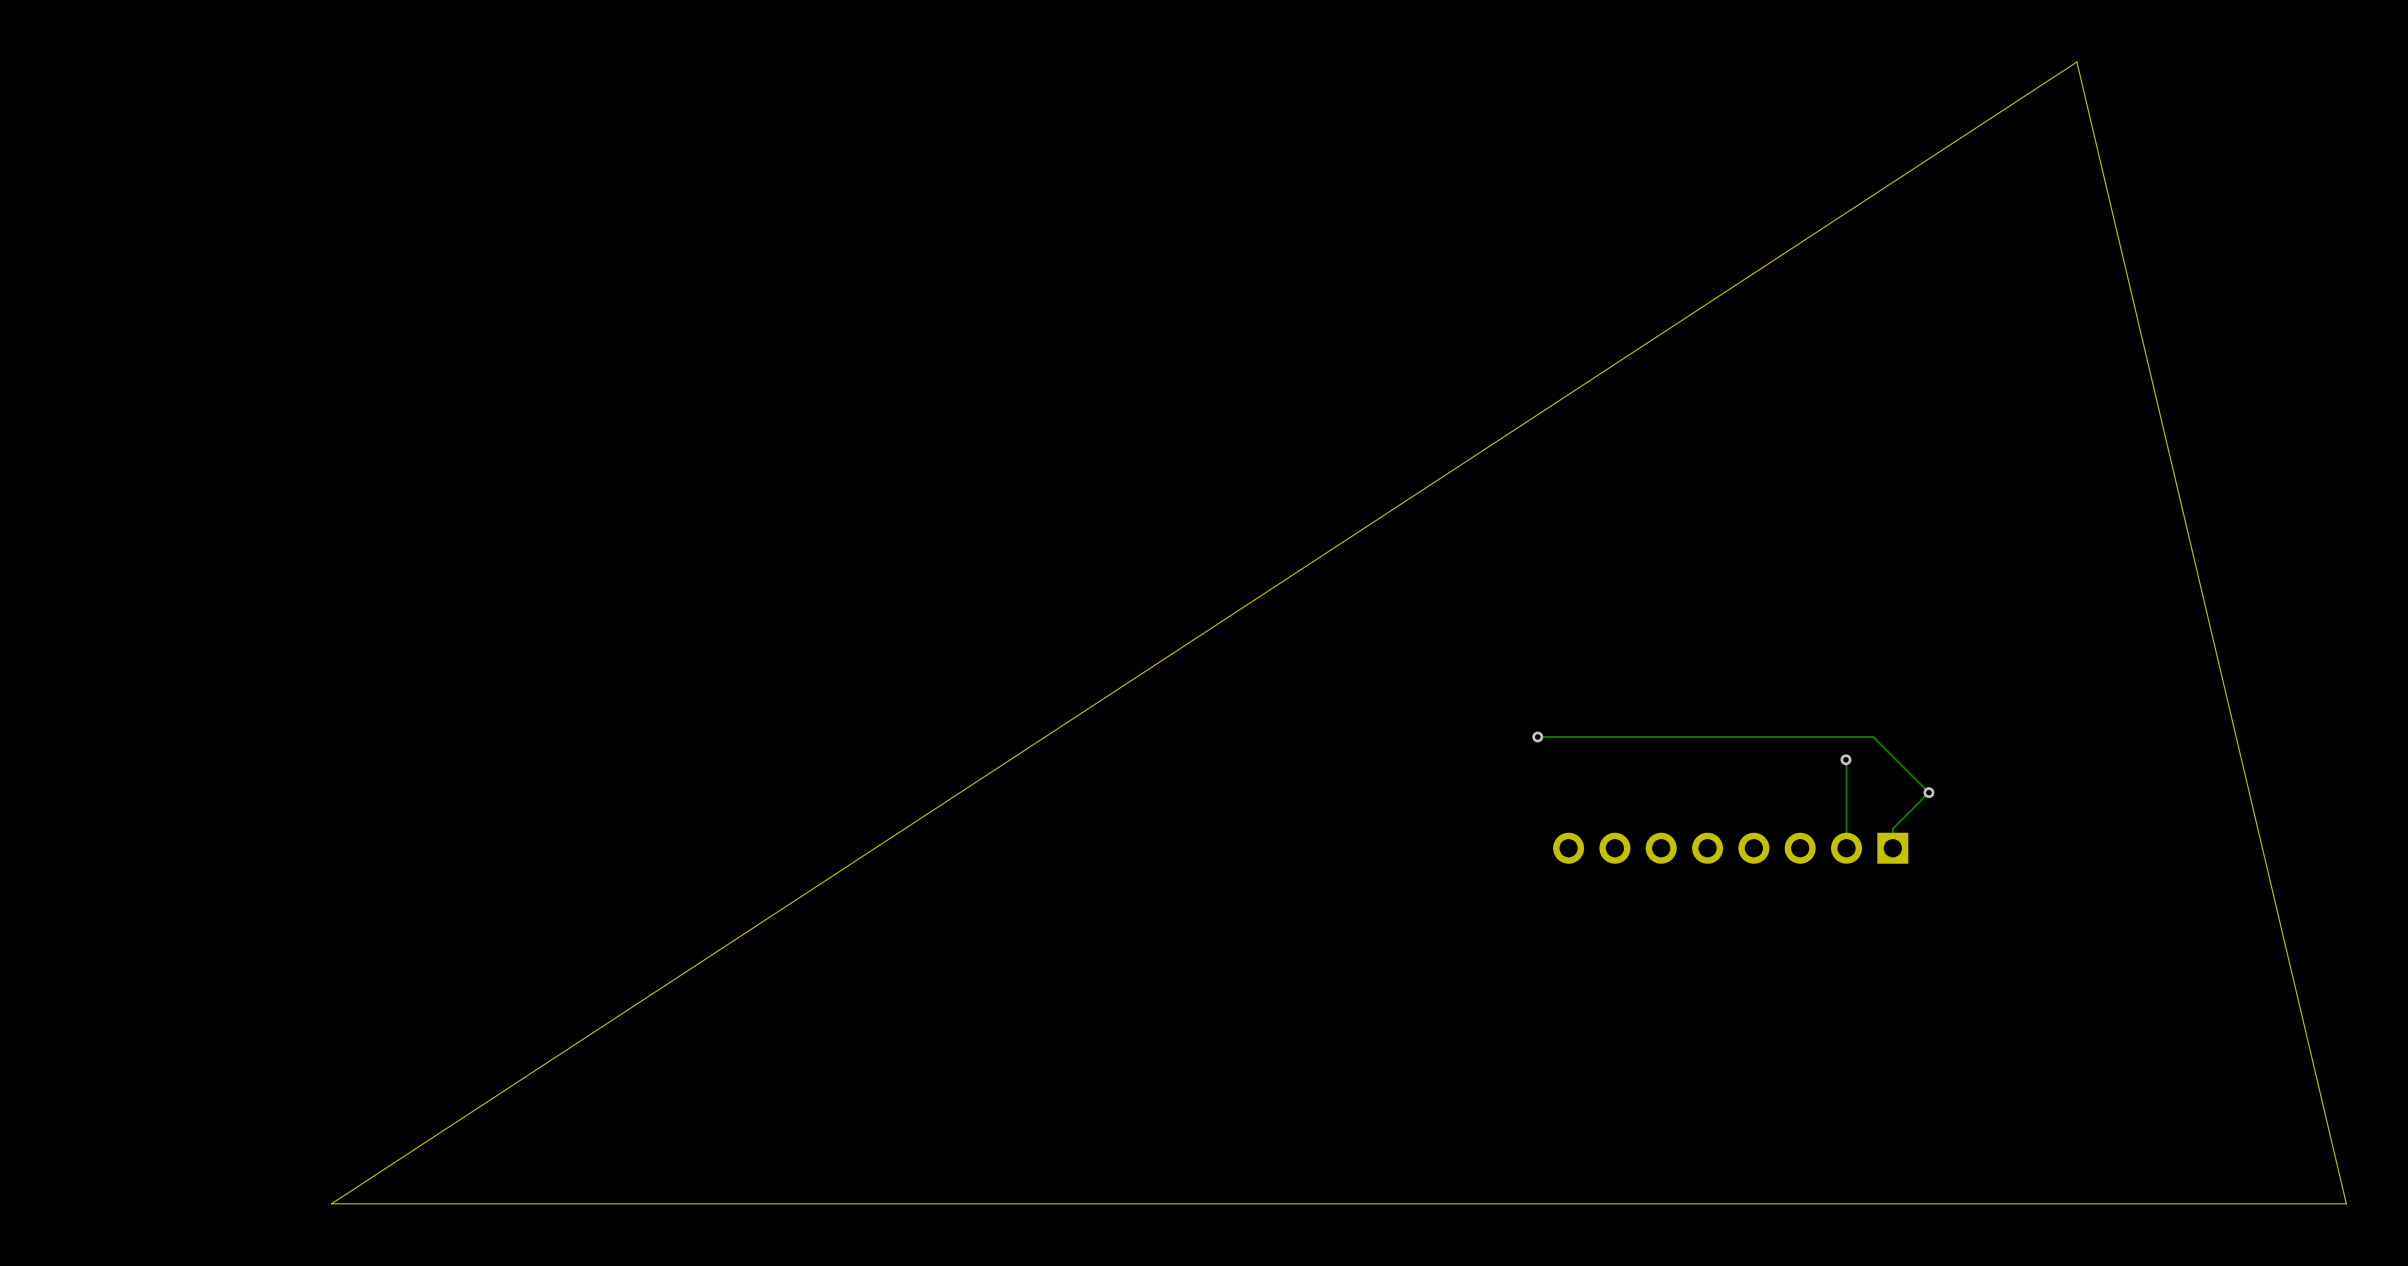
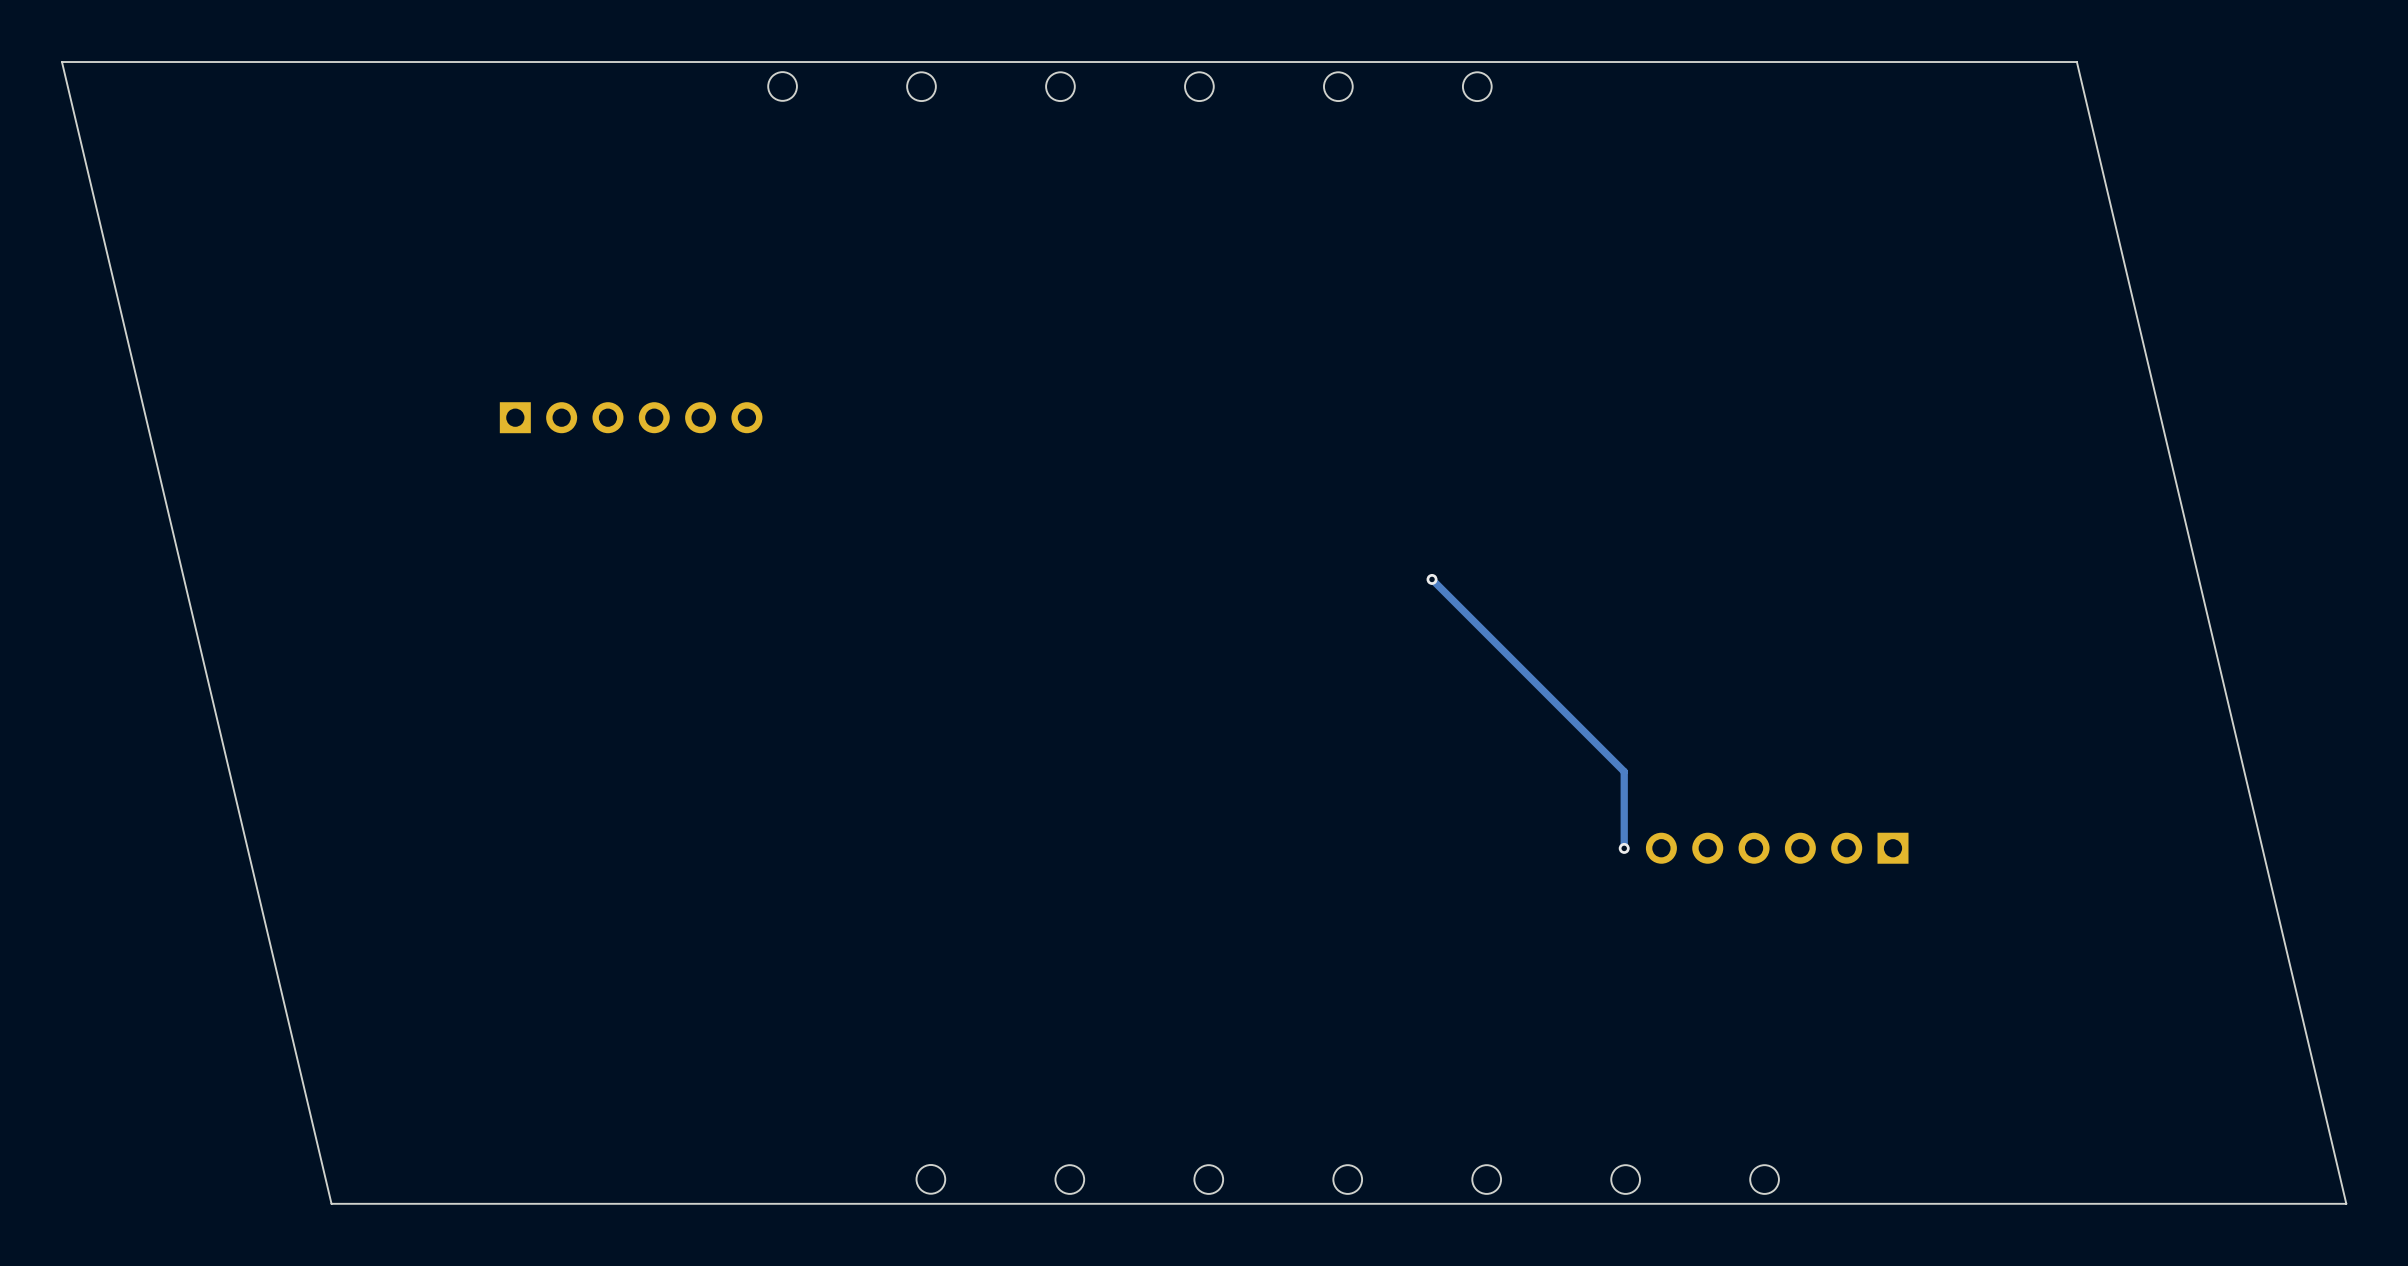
board edge: none -> (62, 62) (331, 1203)
board edge: (2076, 62) (331, 1203) -> (2076, 62) (62, 62)
round board edge: none -> [767, 71, 798, 102]
round board edge: none -> [906, 71, 937, 102]
round board edge: none -> [1045, 71, 1076, 102]
round board edge: none -> [1184, 71, 1215, 102]
round board edge: none -> [1323, 71, 1354, 102]
round board edge: none -> [1462, 71, 1493, 102]
part: none -> (631, 417)
track: none -> (1432, 579) (1624, 771) (1624, 848)
via: none -> (1432, 579)
track: (1537, 736) (1873, 736) (1928, 792) (1892, 828) (1892, 848) -> none
via: (1537, 736) -> none
track: (1845, 759) (1846, 848) -> none
via: (1845, 759) -> none
via: (1928, 792) -> none
via: none -> (1624, 848)
part: (1730, 848) -> none
part: none -> (1777, 848)
round board edge: none -> [916, 1164, 946, 1195]
round board edge: none -> [1054, 1164, 1085, 1195]
round board edge: none -> [1193, 1164, 1224, 1195]
round board edge: none -> [1332, 1164, 1363, 1195]
round board edge: none -> [1471, 1164, 1502, 1195]
round board edge: none -> [1610, 1164, 1641, 1195]
round board edge: none -> [1749, 1164, 1780, 1195]

